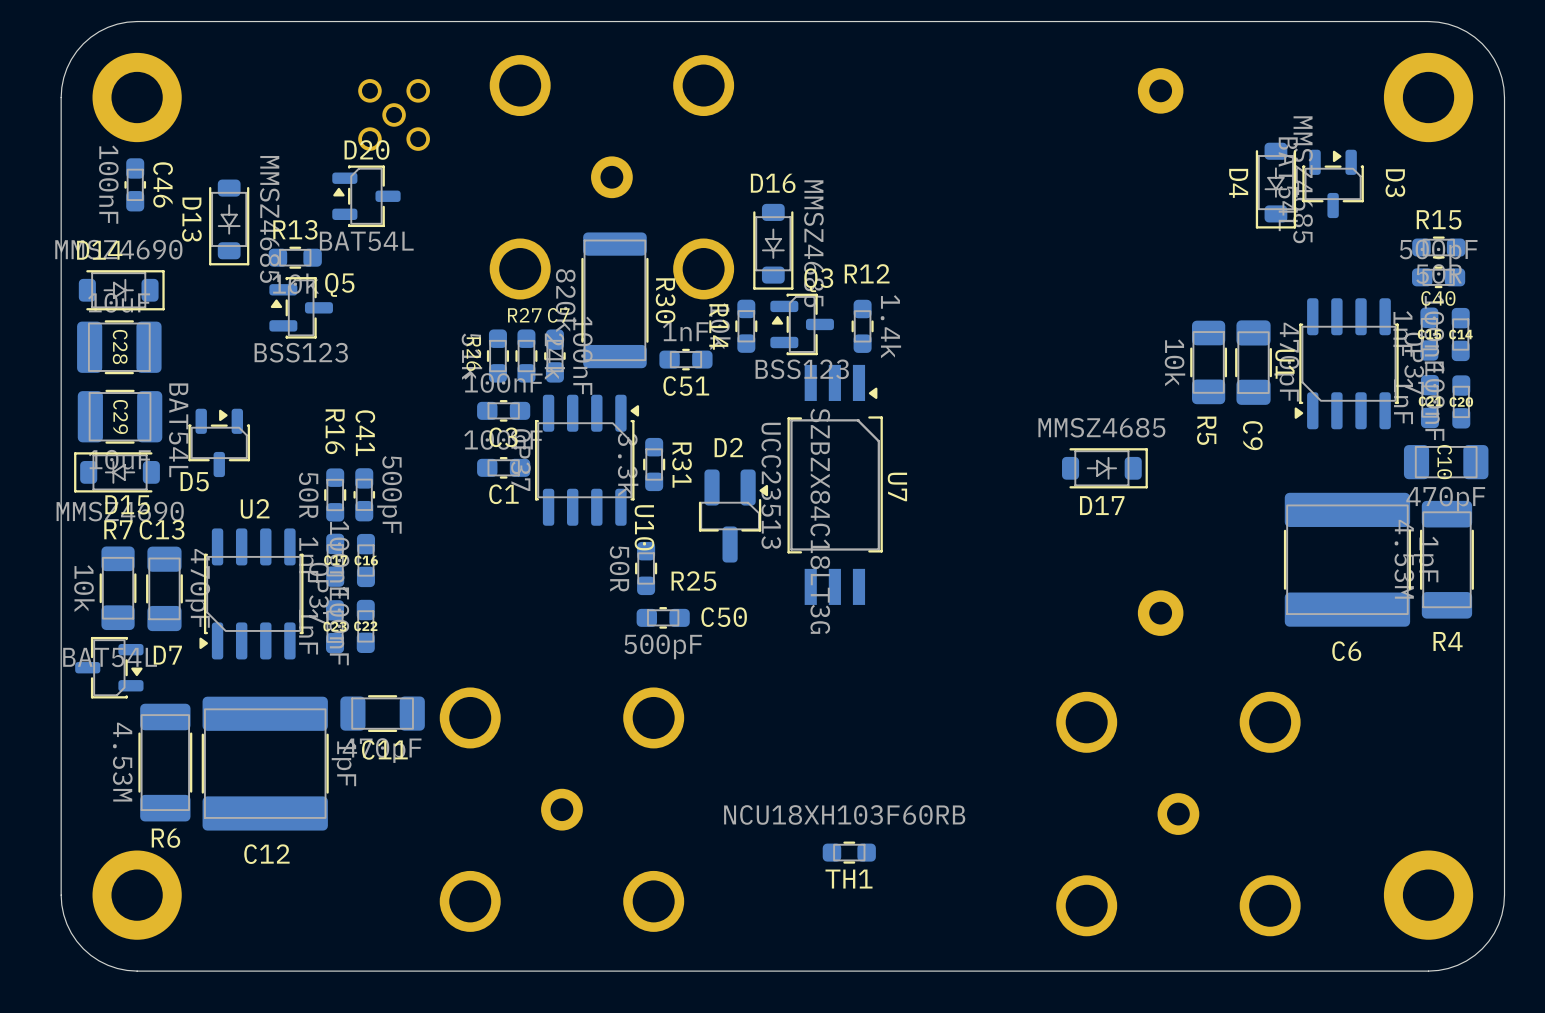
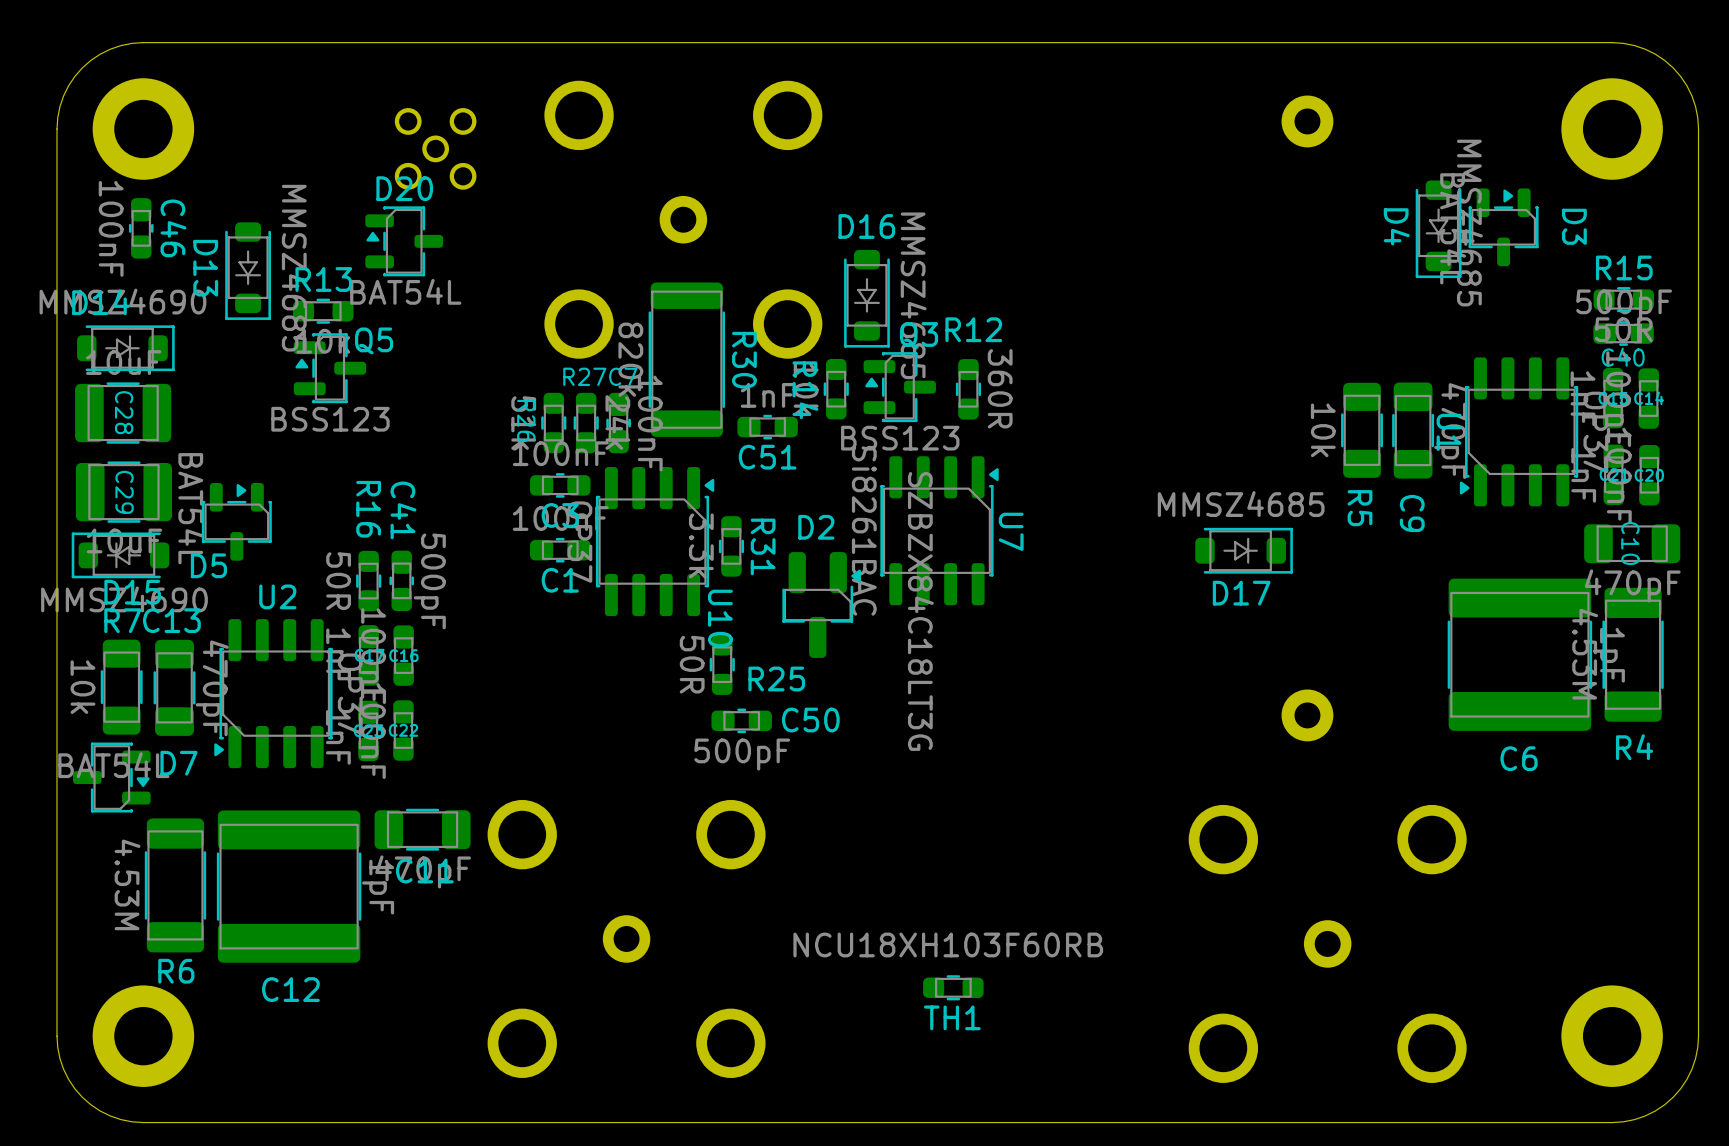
R12 value: 1.4k (890, 326) -> 360R (1000, 388)
U7 footprint: [787, 364, 883, 605] -> [880, 456, 999, 606]
U7 value: UCC23513 (771, 485) -> Si8261BAC (864, 530)

